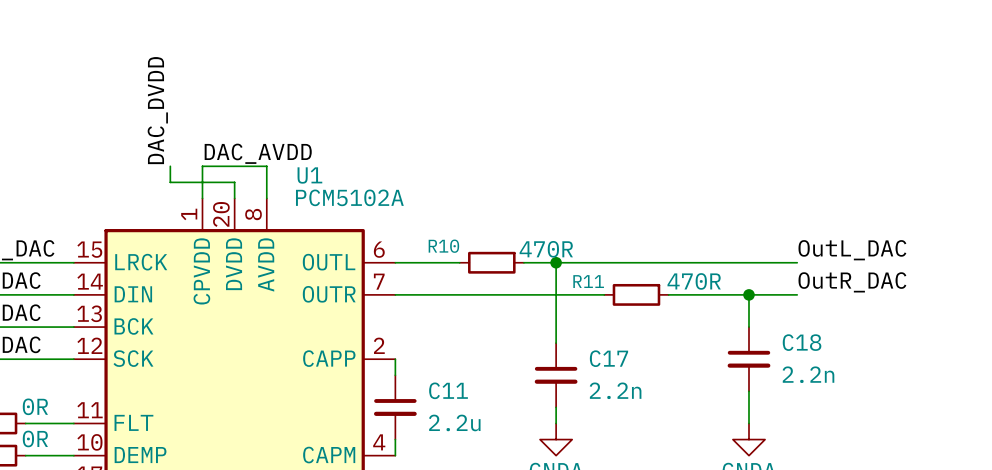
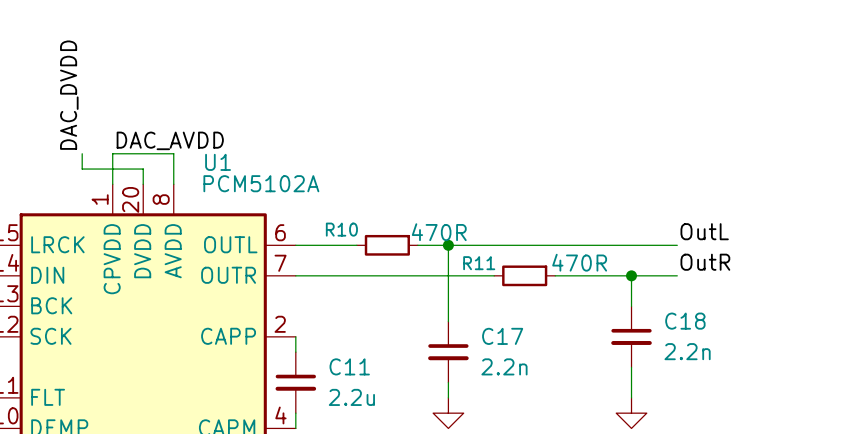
label: OutL_DAC (852, 250) -> OutL (704, 231)
label: OutR_DAC (852, 282) -> OutR (705, 262)

